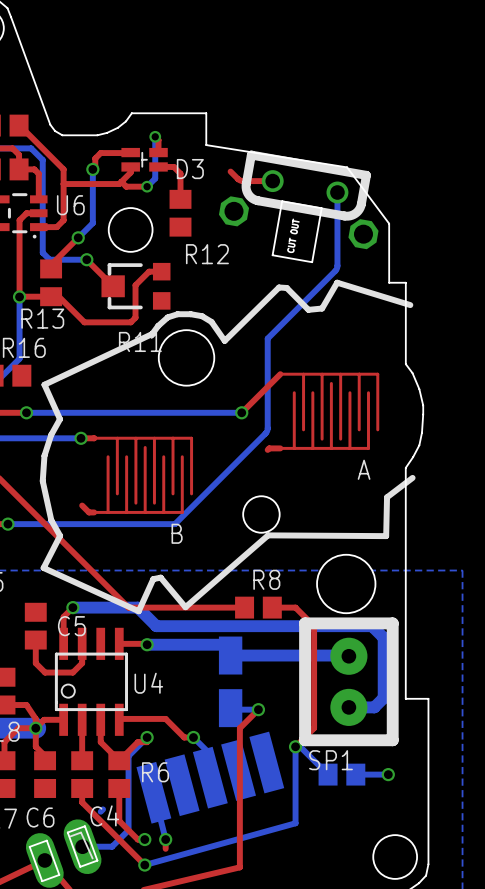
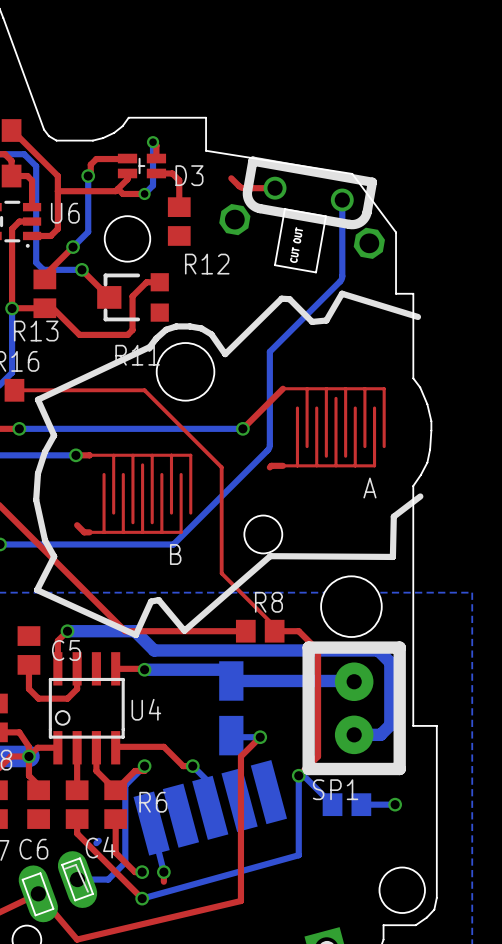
top track: none -> (14, 390) (144, 390) (221, 467) (221, 573) (279, 631)

